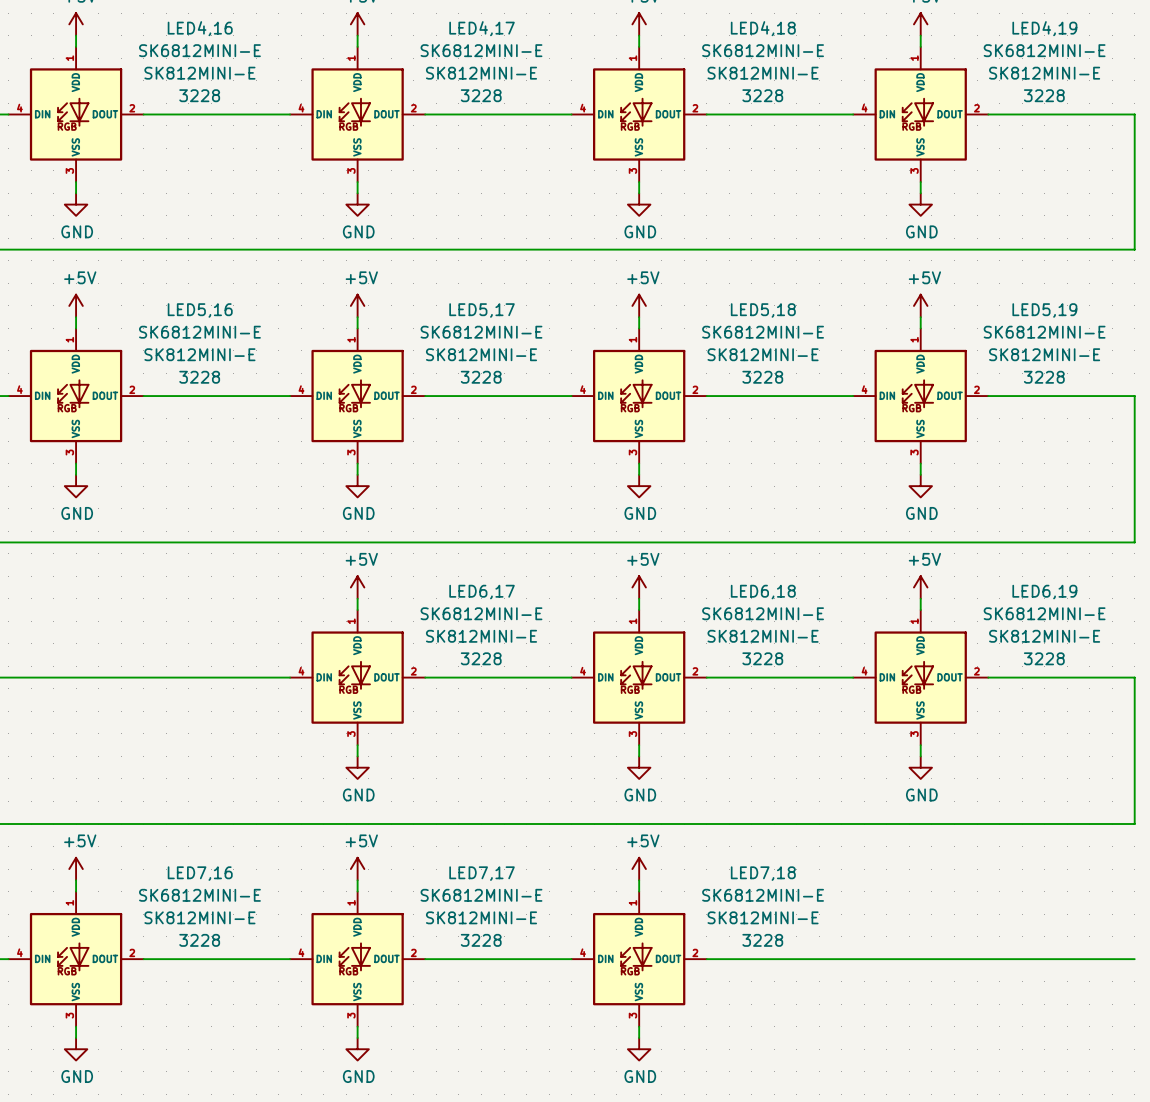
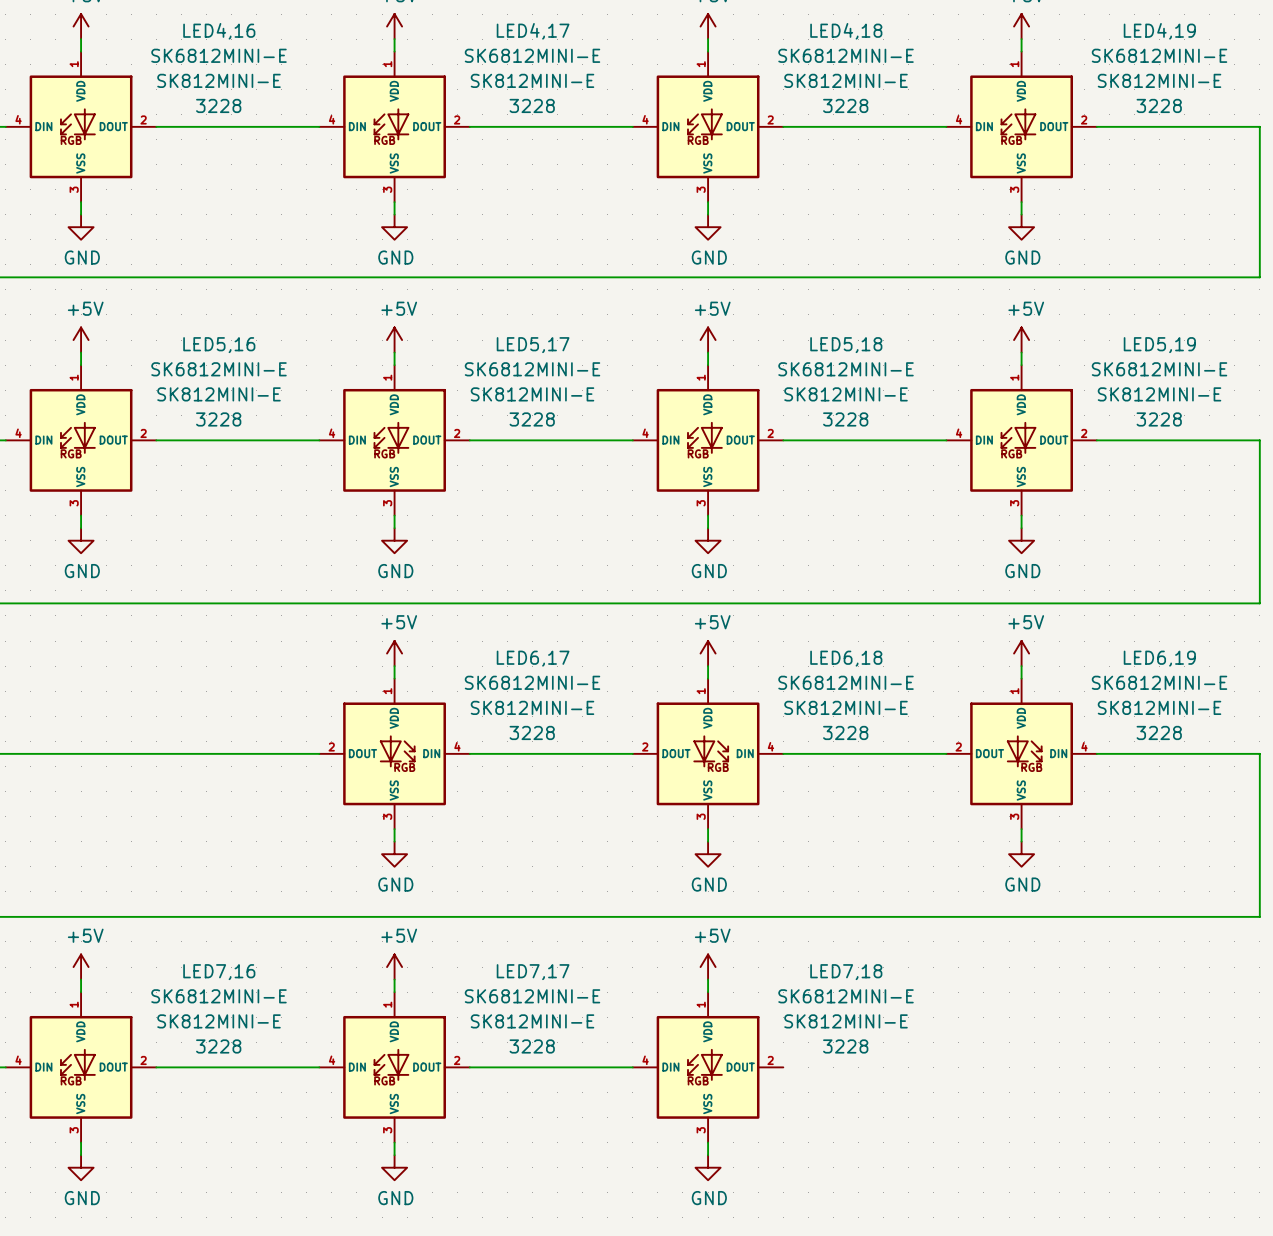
LED6,17 flip: as is (357, 677) -> left-right (394, 753)
LED6,18 flip: as is (639, 677) -> left-right (708, 753)
LED6,19 flip: as is (920, 677) -> left-right (1021, 753)
wire: (706, 959) (1134, 959) -> none

